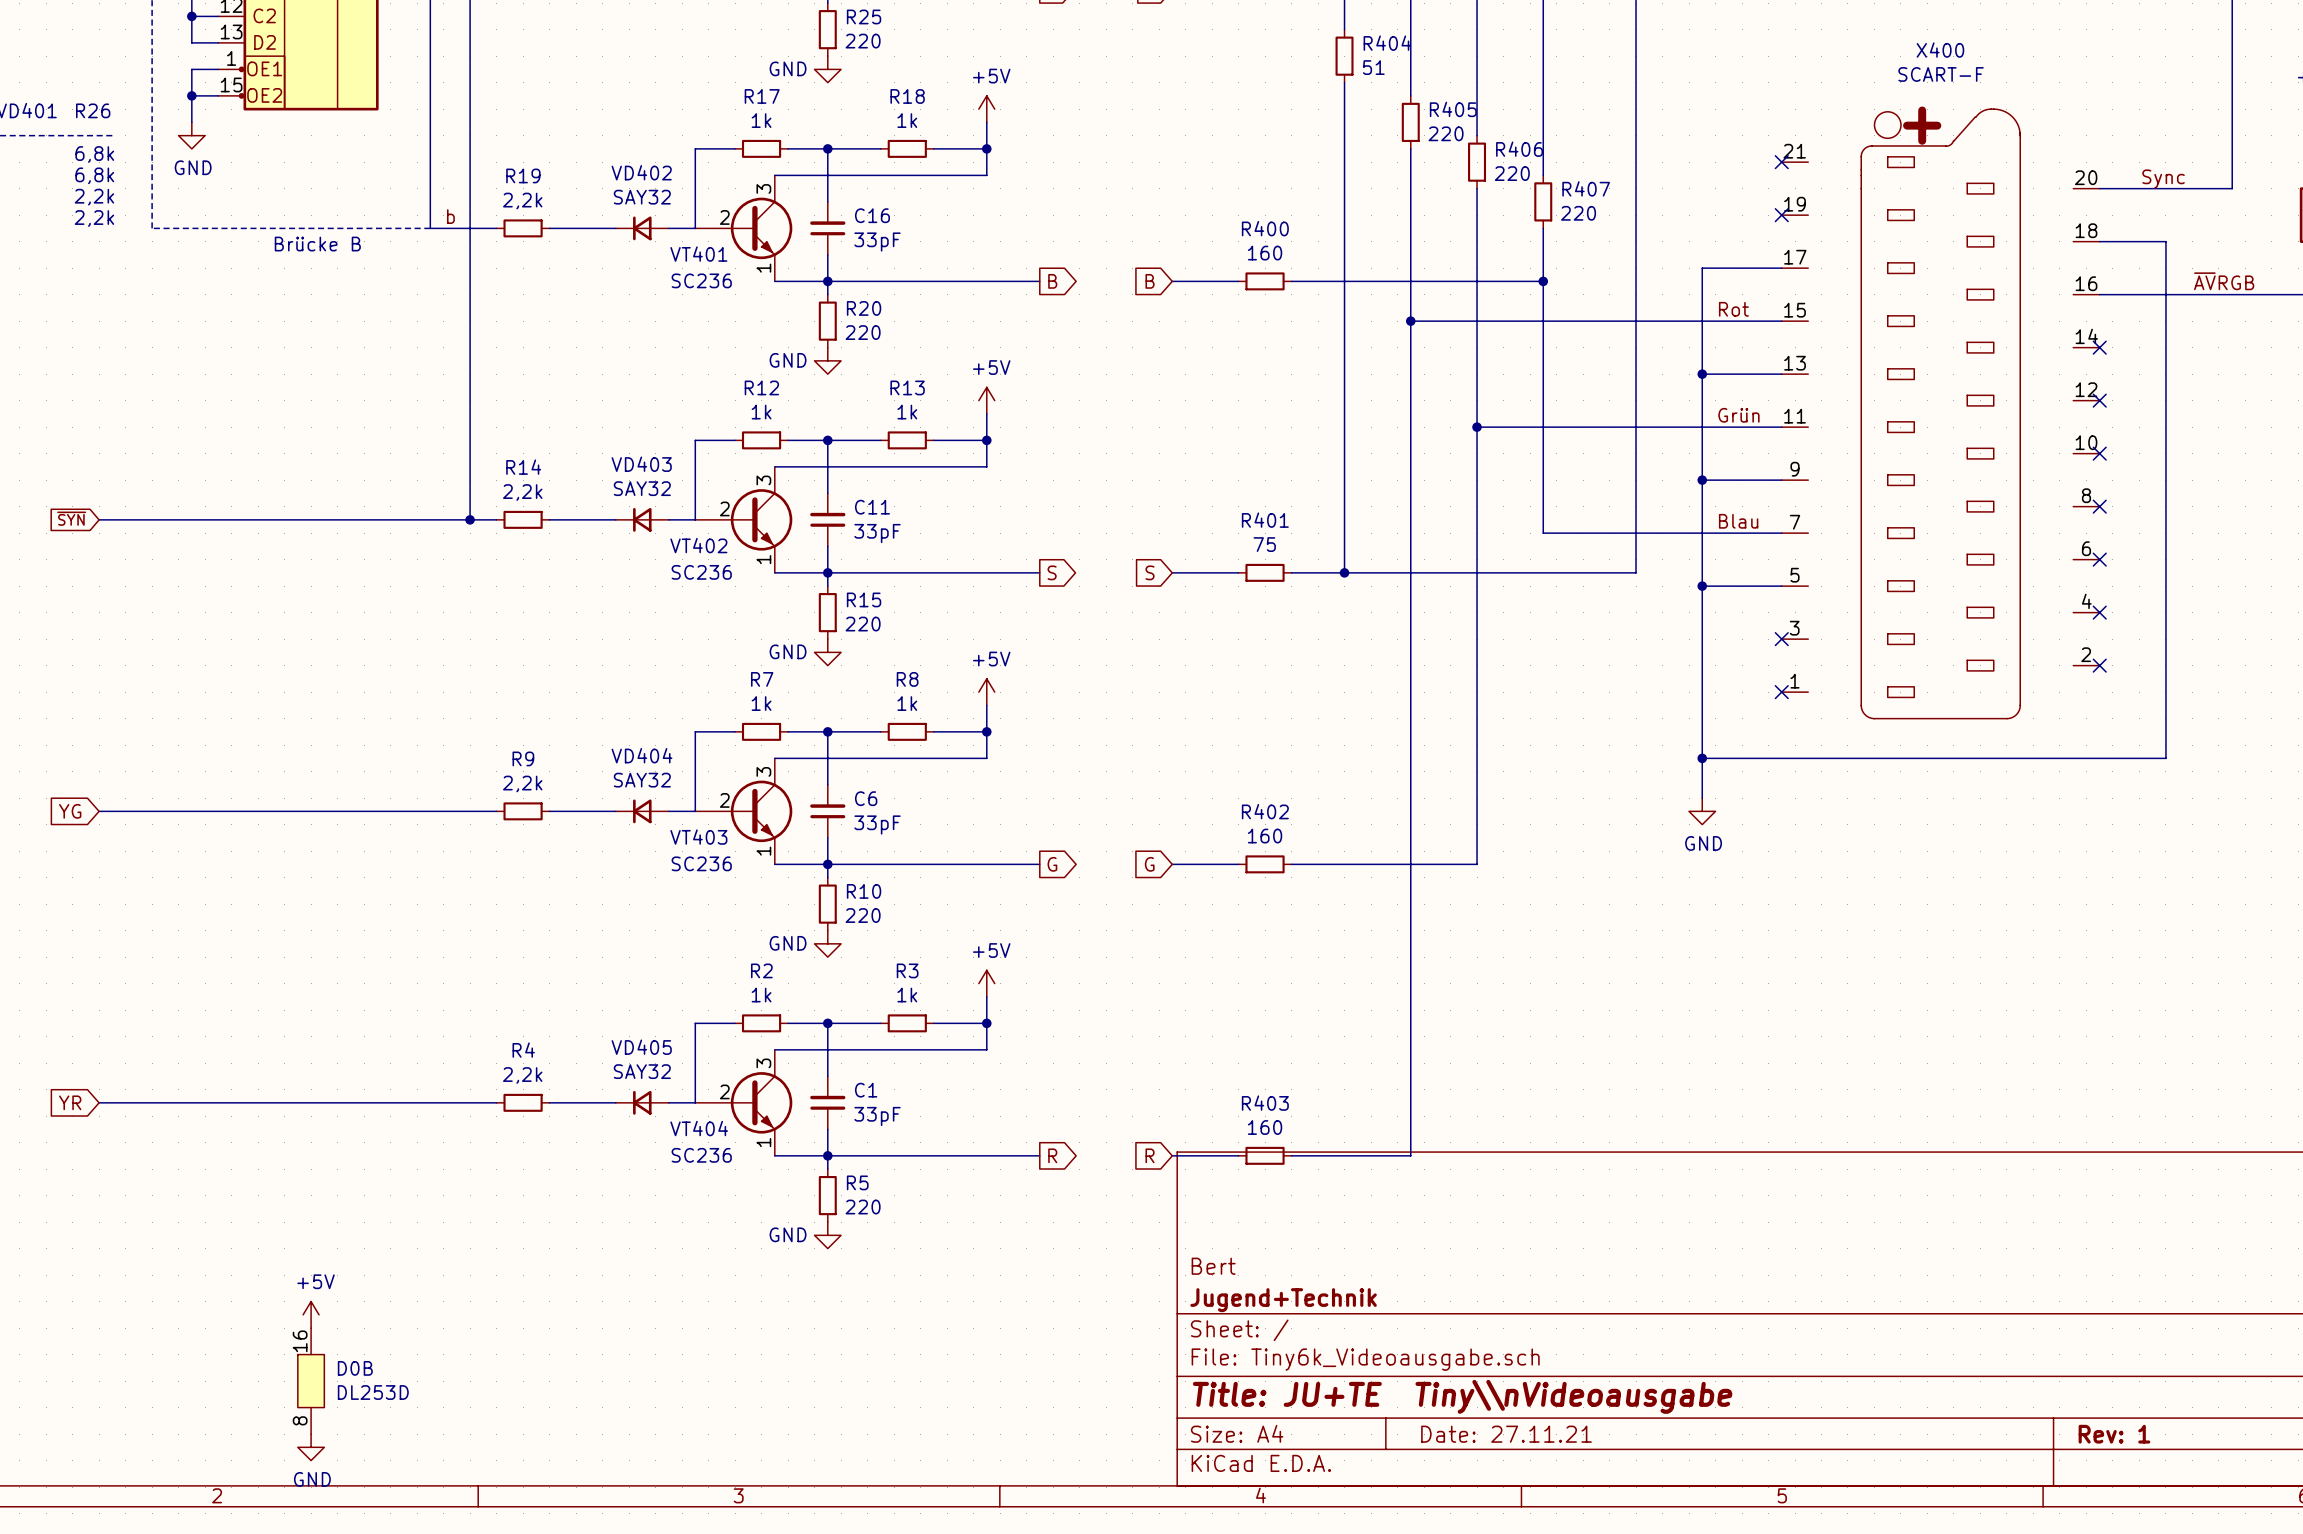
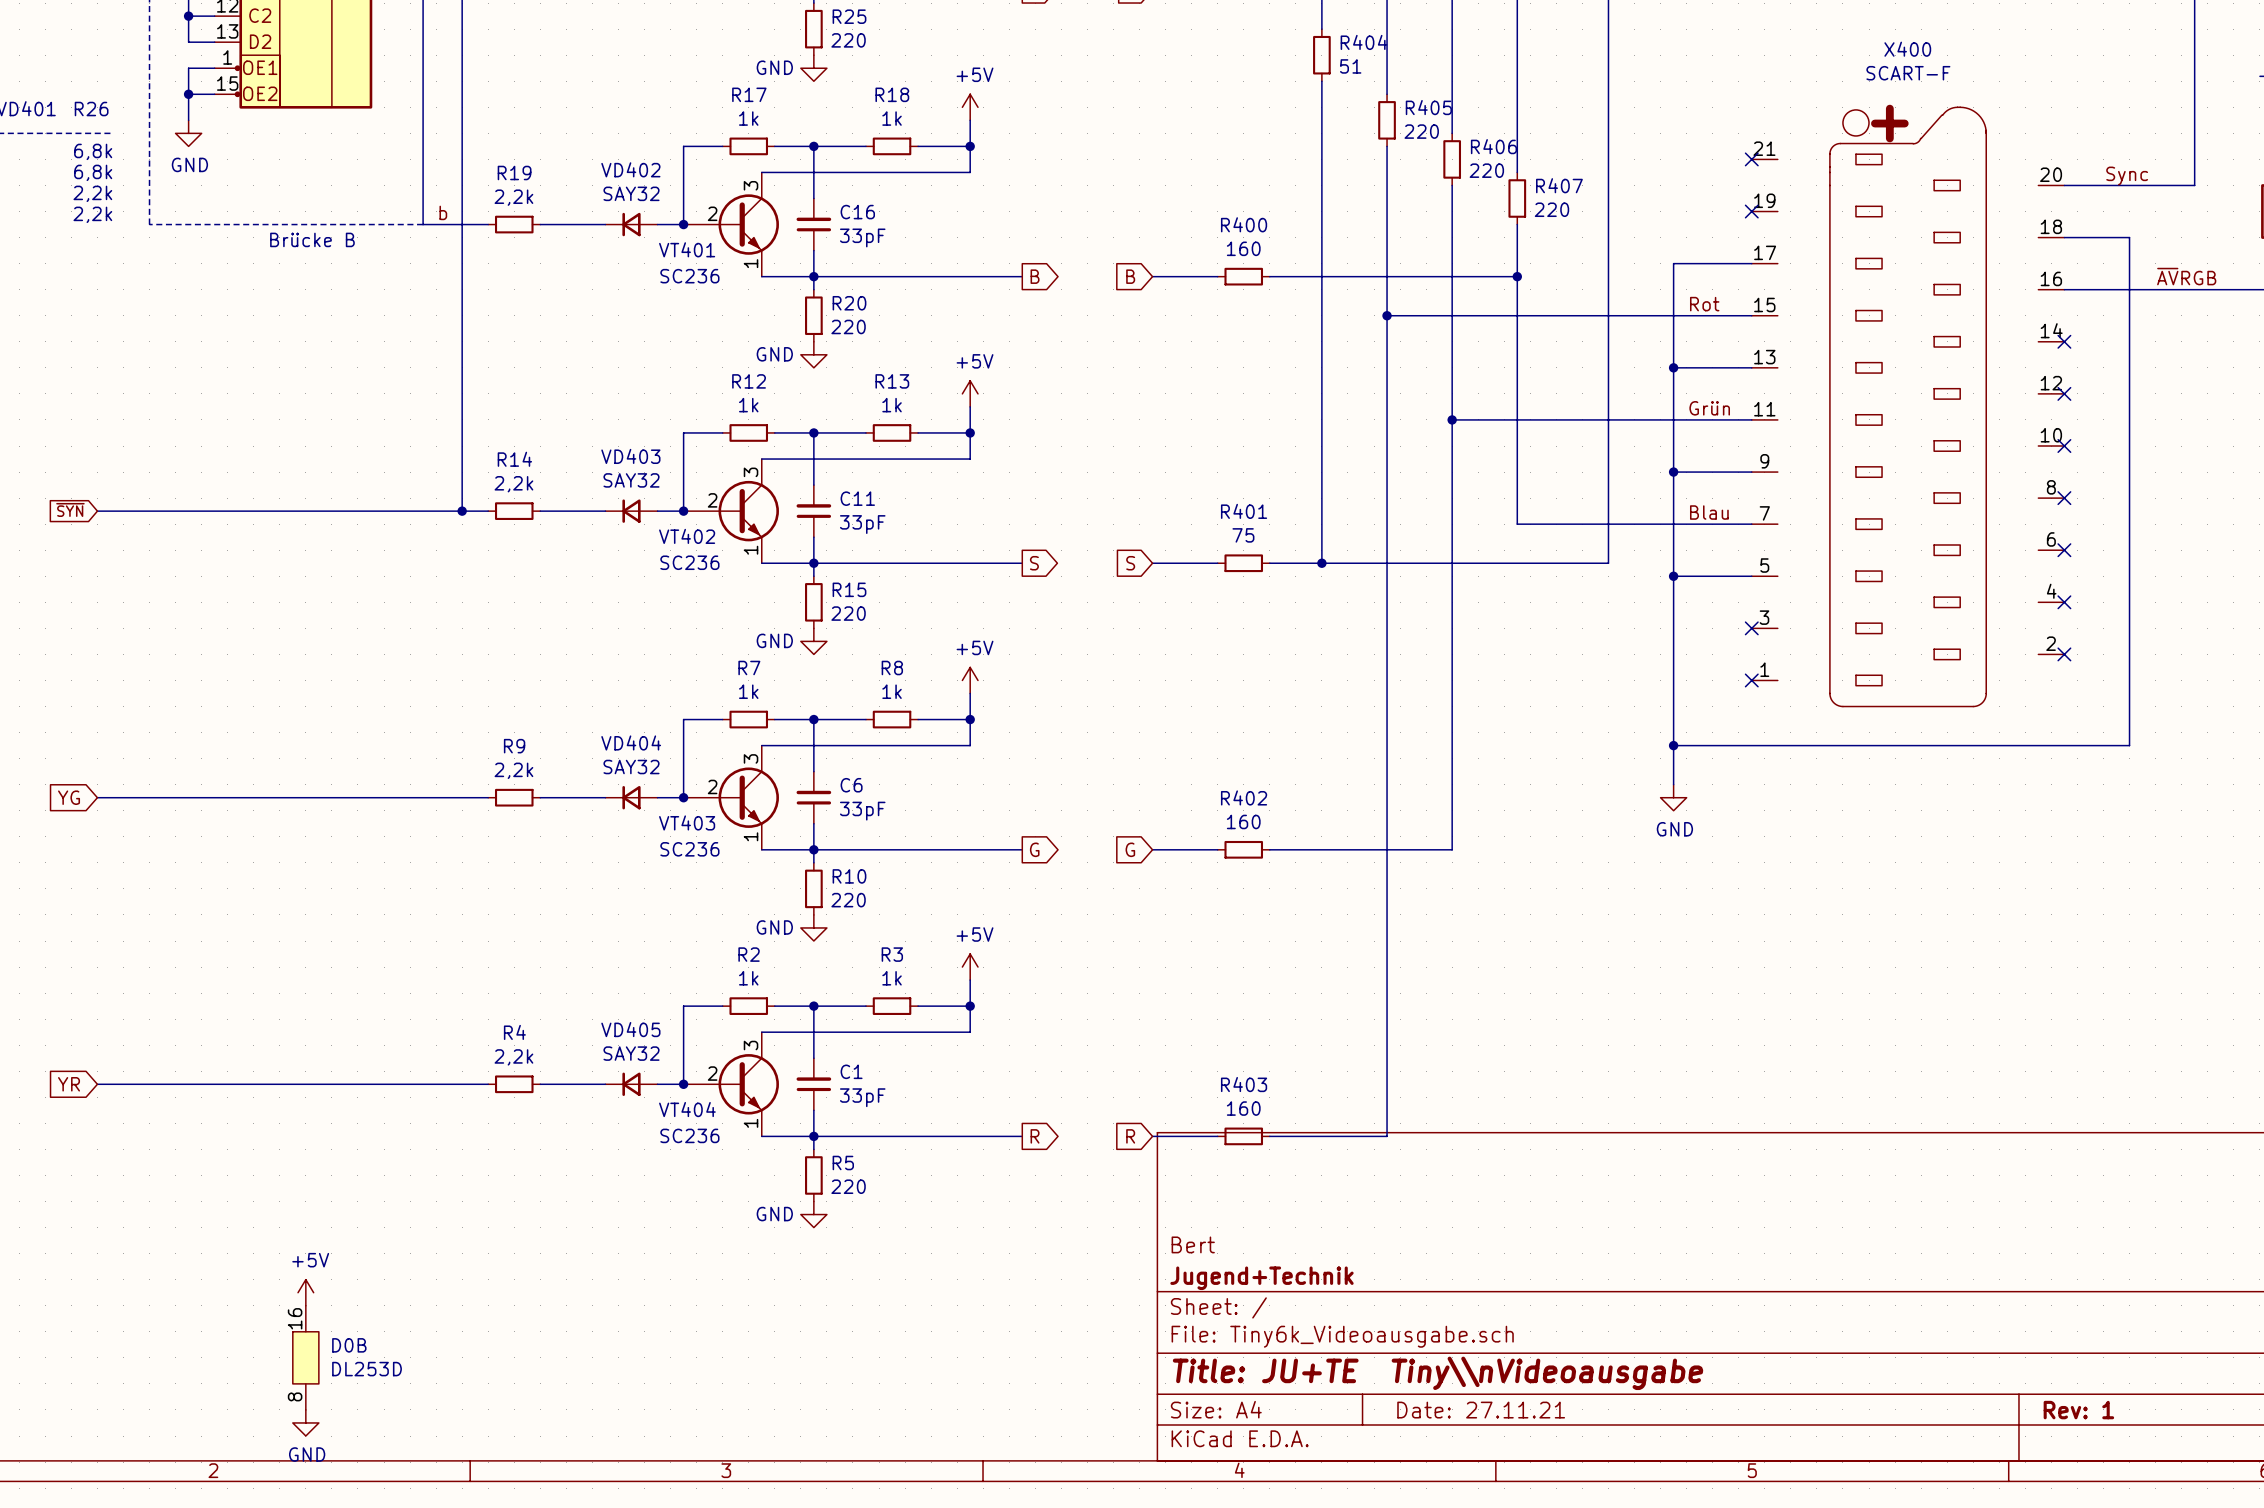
junction: none -> (683, 224)
junction: none -> (683, 511)
junction: none -> (683, 797)
junction: none -> (683, 1084)

